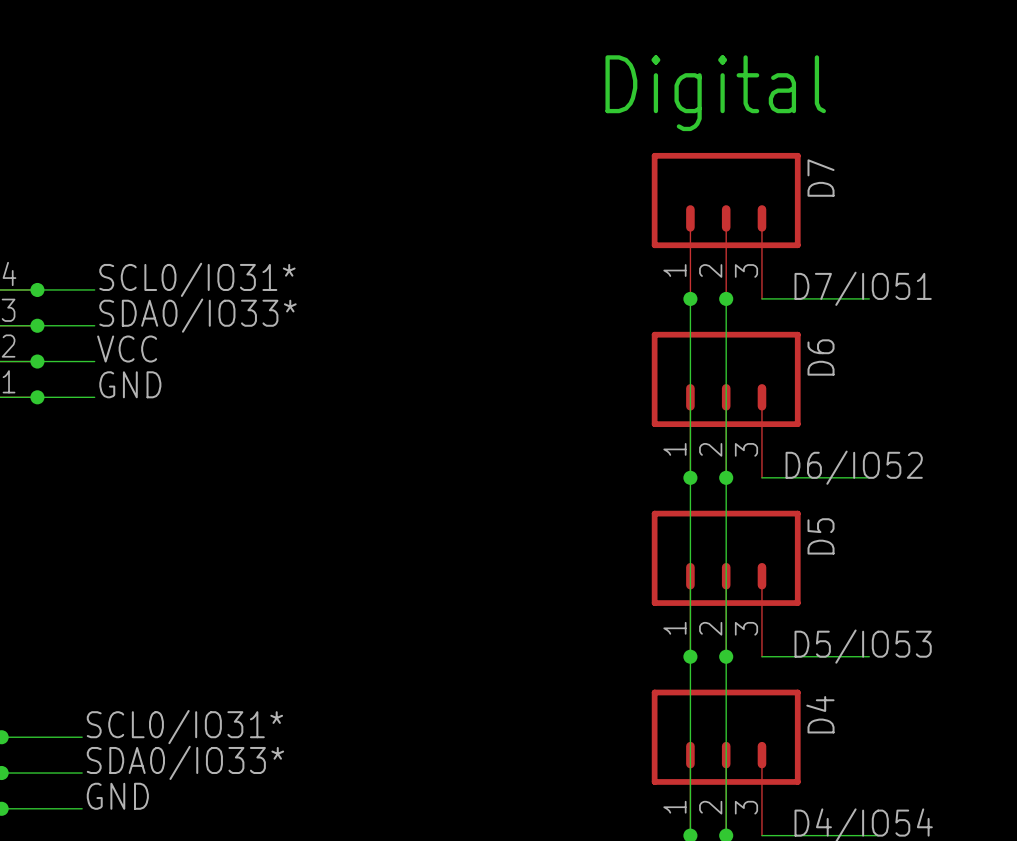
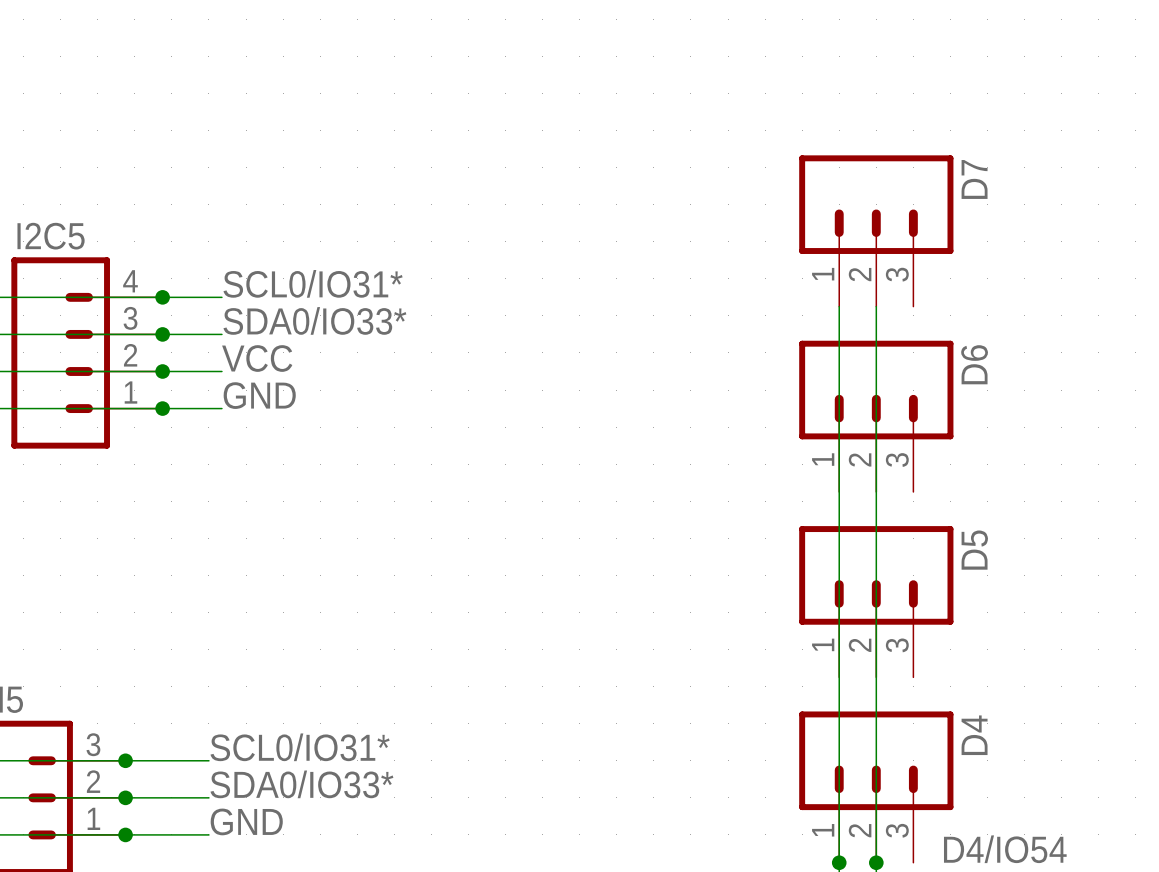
text: Digital (715, 93) -> none
label: D7/IO51 (863, 288) -> none
junction: (690, 298) -> none
junction: (726, 298) -> none
wire: (761, 298) (869, 298) -> none
label: D6/IO52 (854, 467) -> none
junction: (690, 477) -> none
junction: (726, 477) -> none
wire: (761, 477) (869, 477) -> none
label: D5/IO53 (863, 646) -> none
junction: (690, 656) -> none
junction: (726, 656) -> none
wire: (761, 656) (869, 656) -> none
wire: (761, 835) (878, 835) -> none

